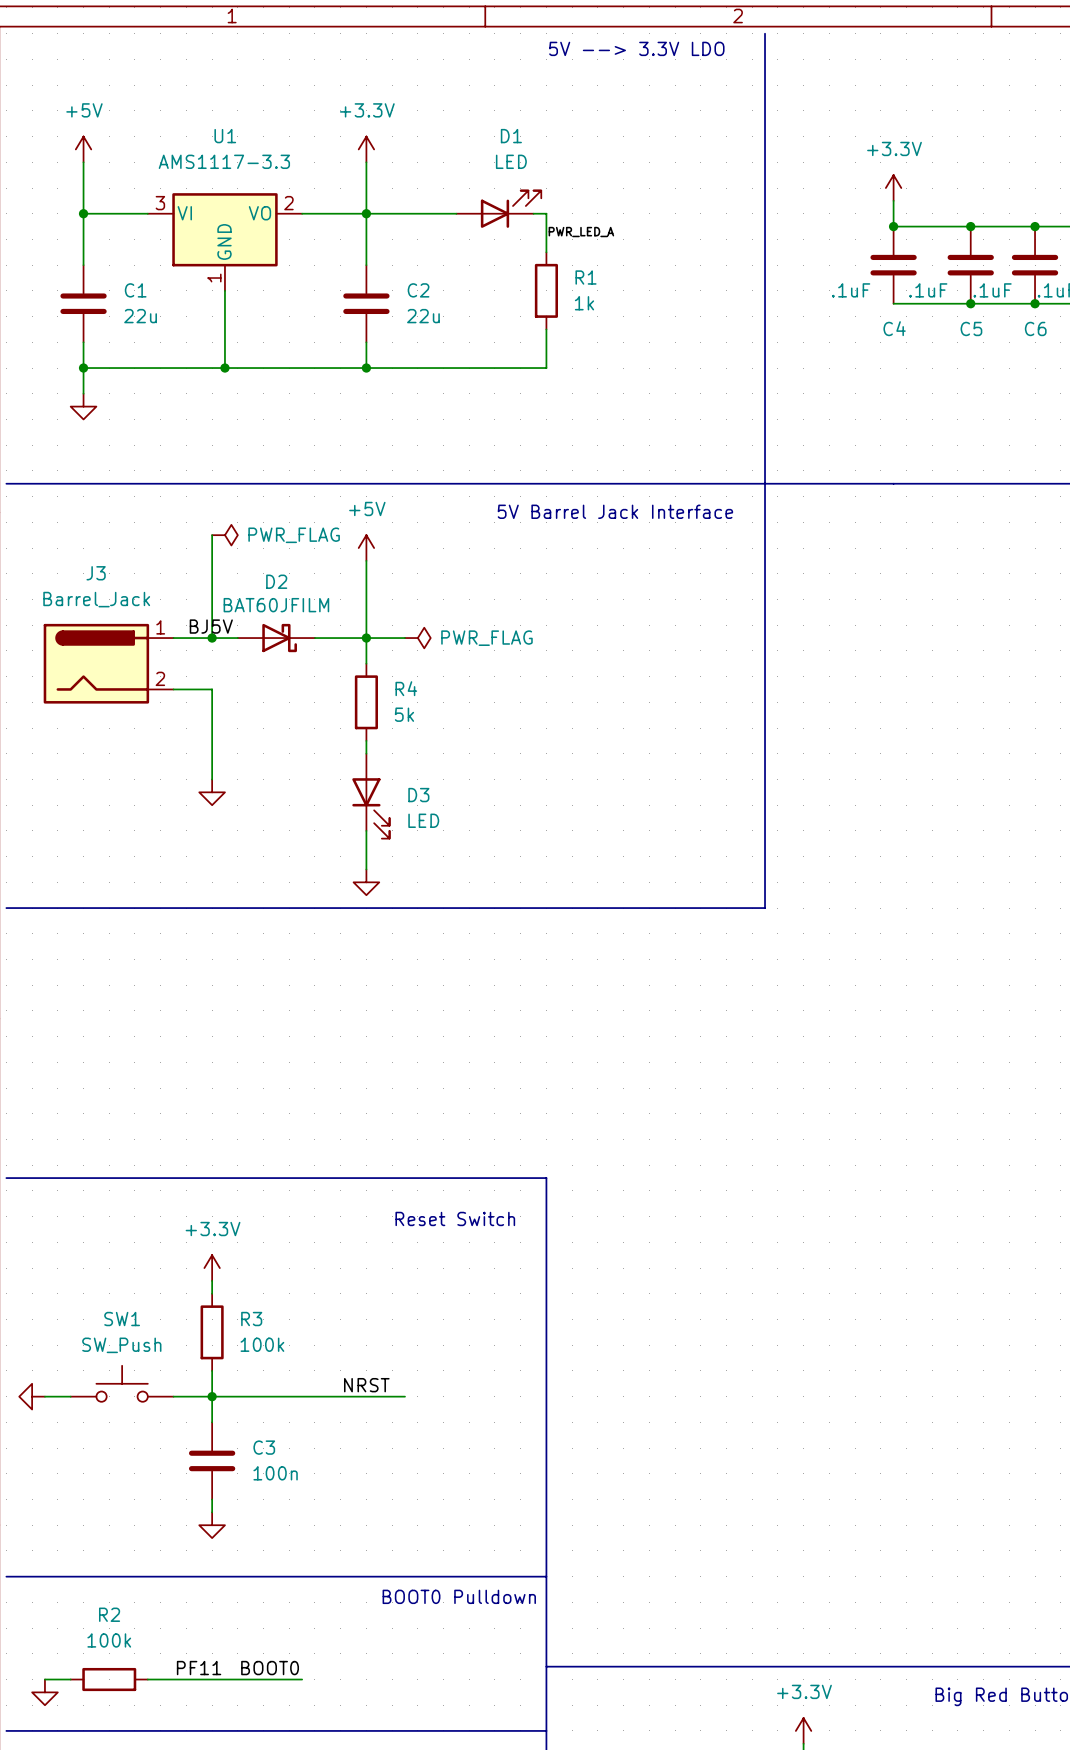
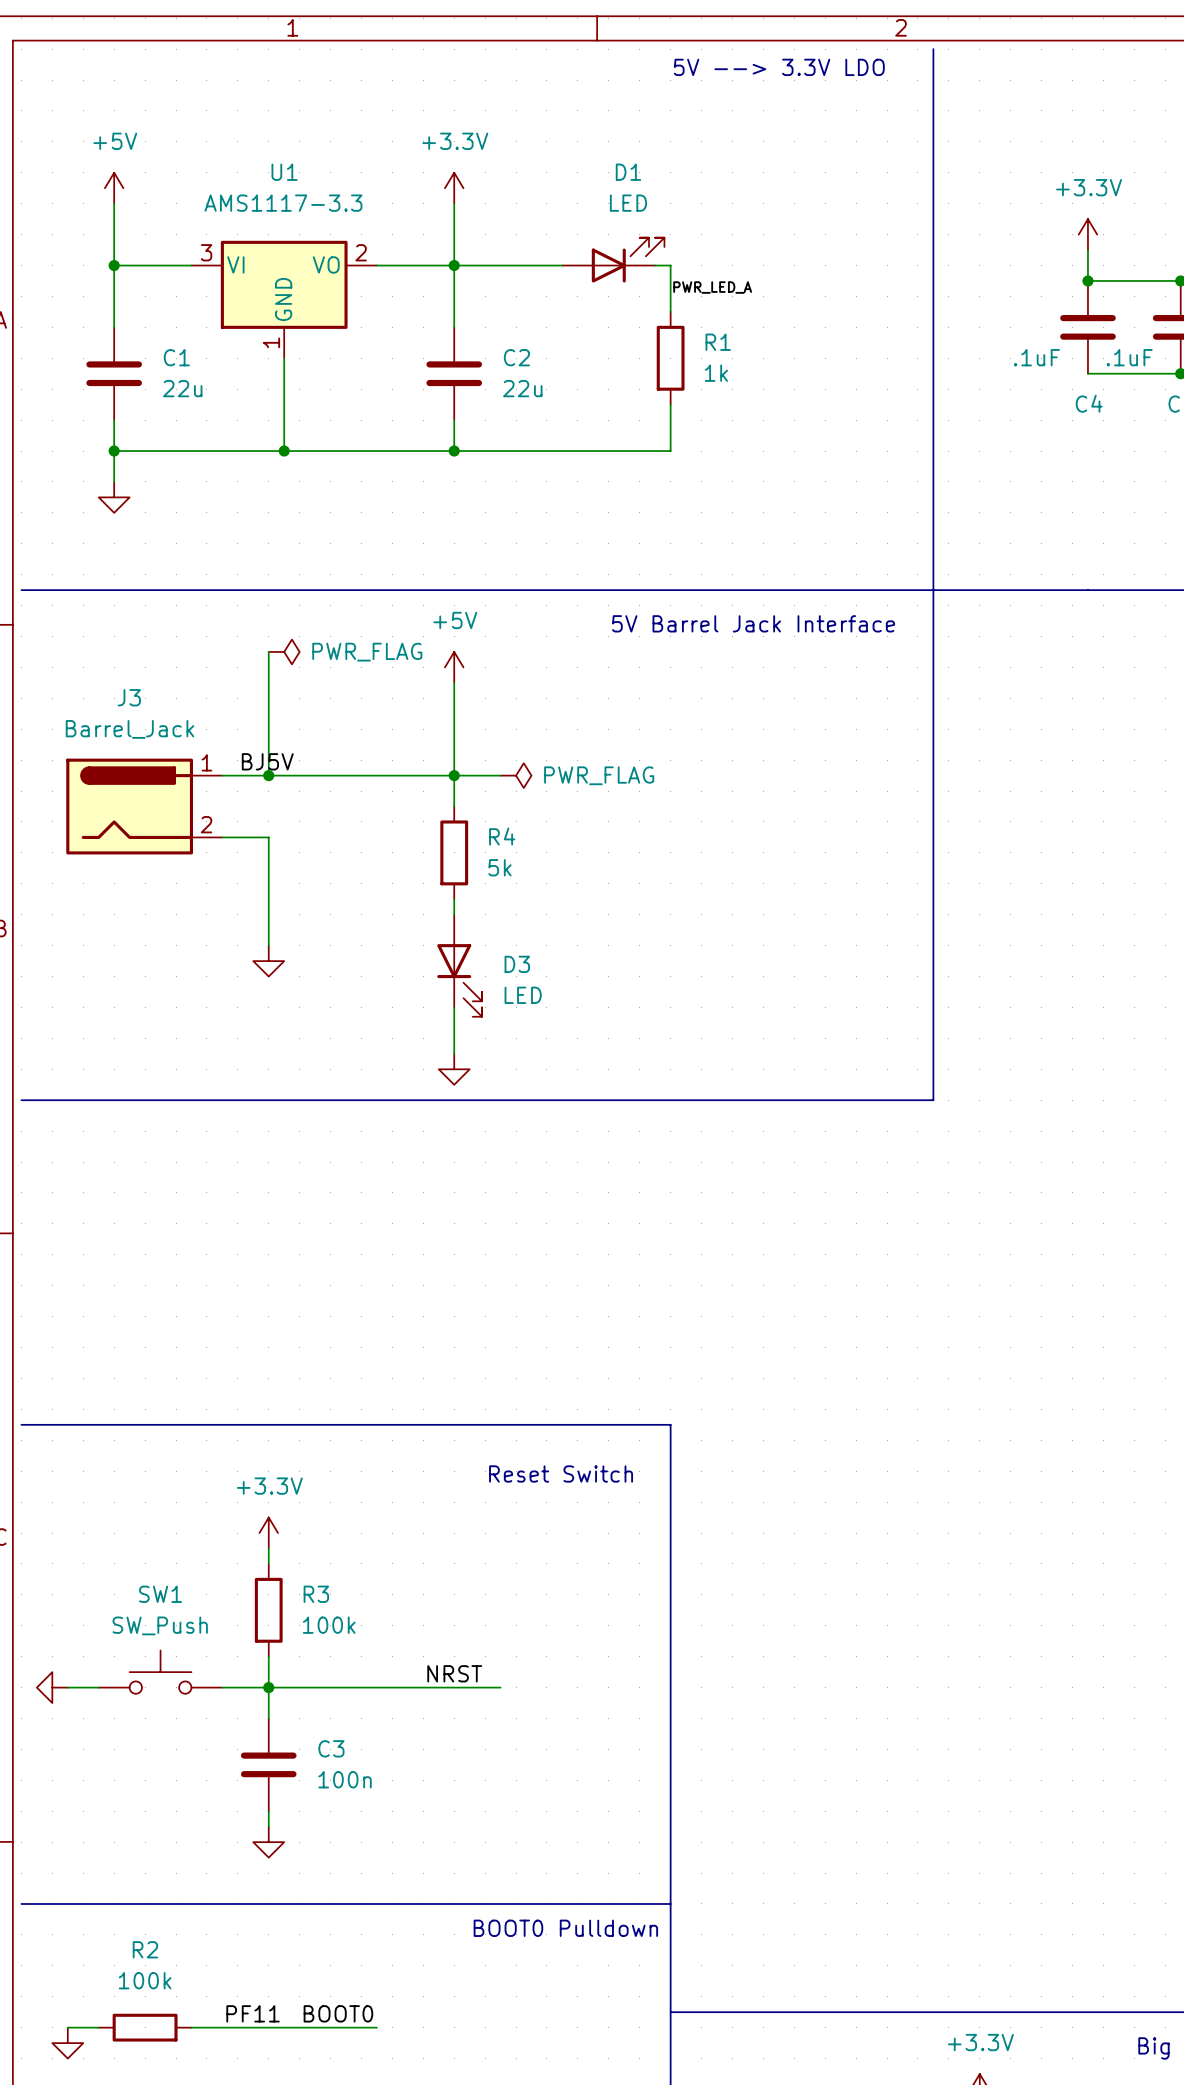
D2: BAT60JFILM (276, 638) -> none

